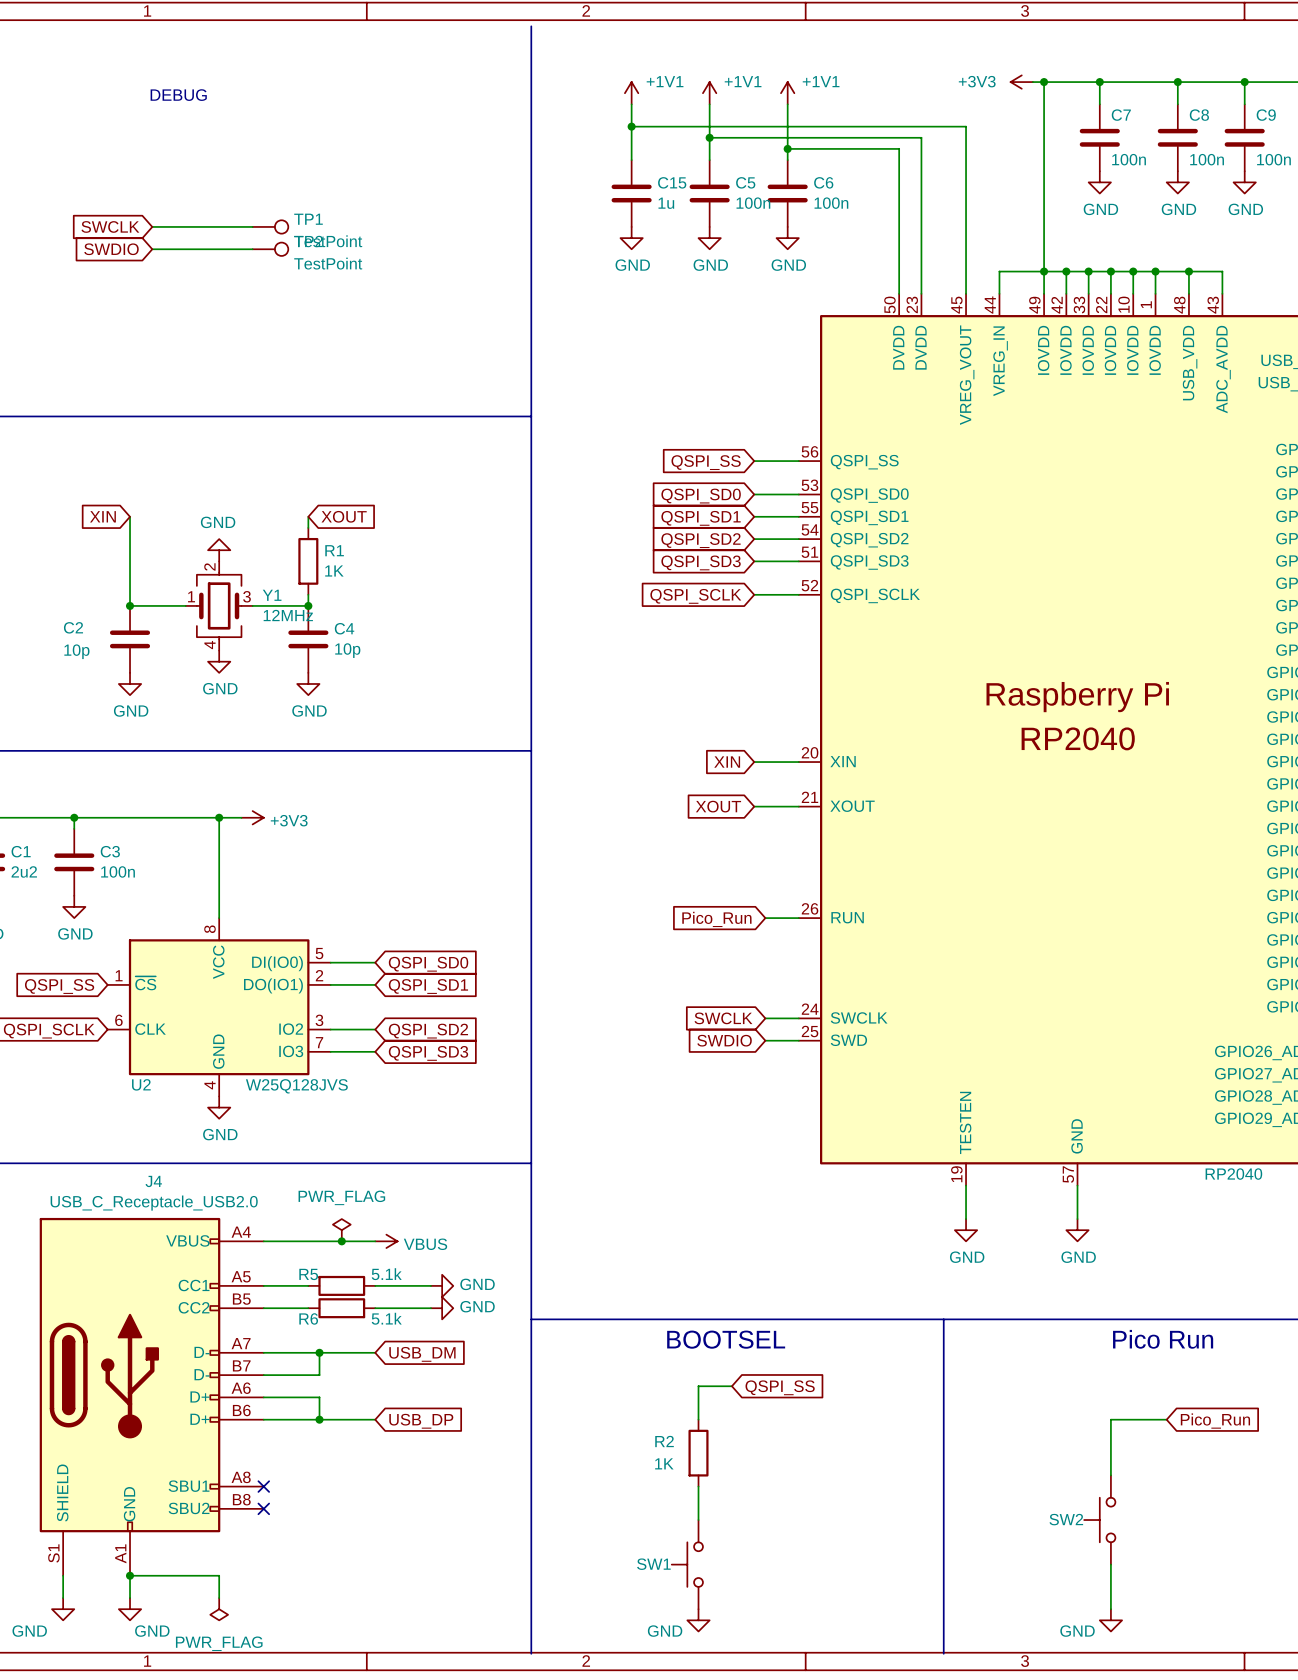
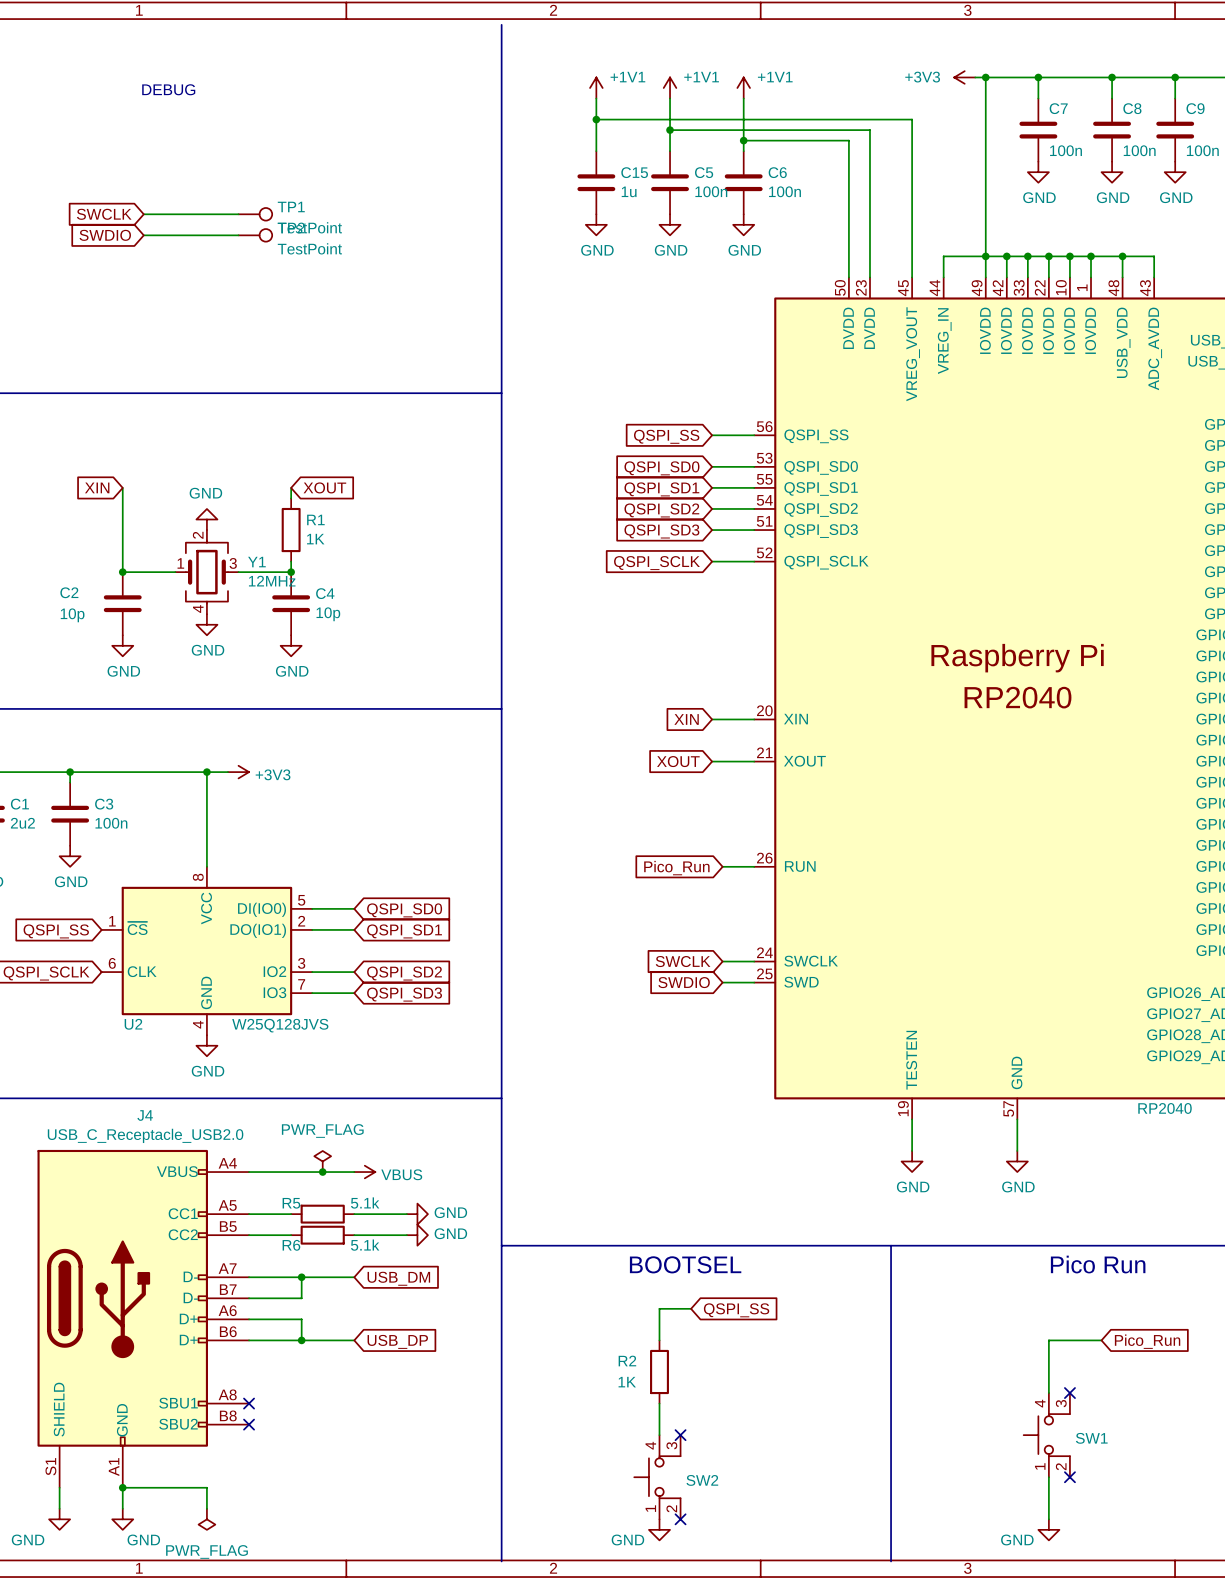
SW2 symbol: [1084, 1475, 1116, 1565] -> [634, 1435, 681, 1520]
no-connect mark: none -> (1069, 1393)
SW2 name position: SW2 (1066, 1519) -> SW2 (702, 1480)
SW1 symbol: [671, 1520, 703, 1610] -> [1023, 1393, 1070, 1478]
no-connect mark: none -> (680, 1435)
SW1 name position: SW1 (653, 1564) -> SW1 (1091, 1438)
no-connect mark: none -> (1069, 1477)
no-connect mark: none -> (680, 1519)

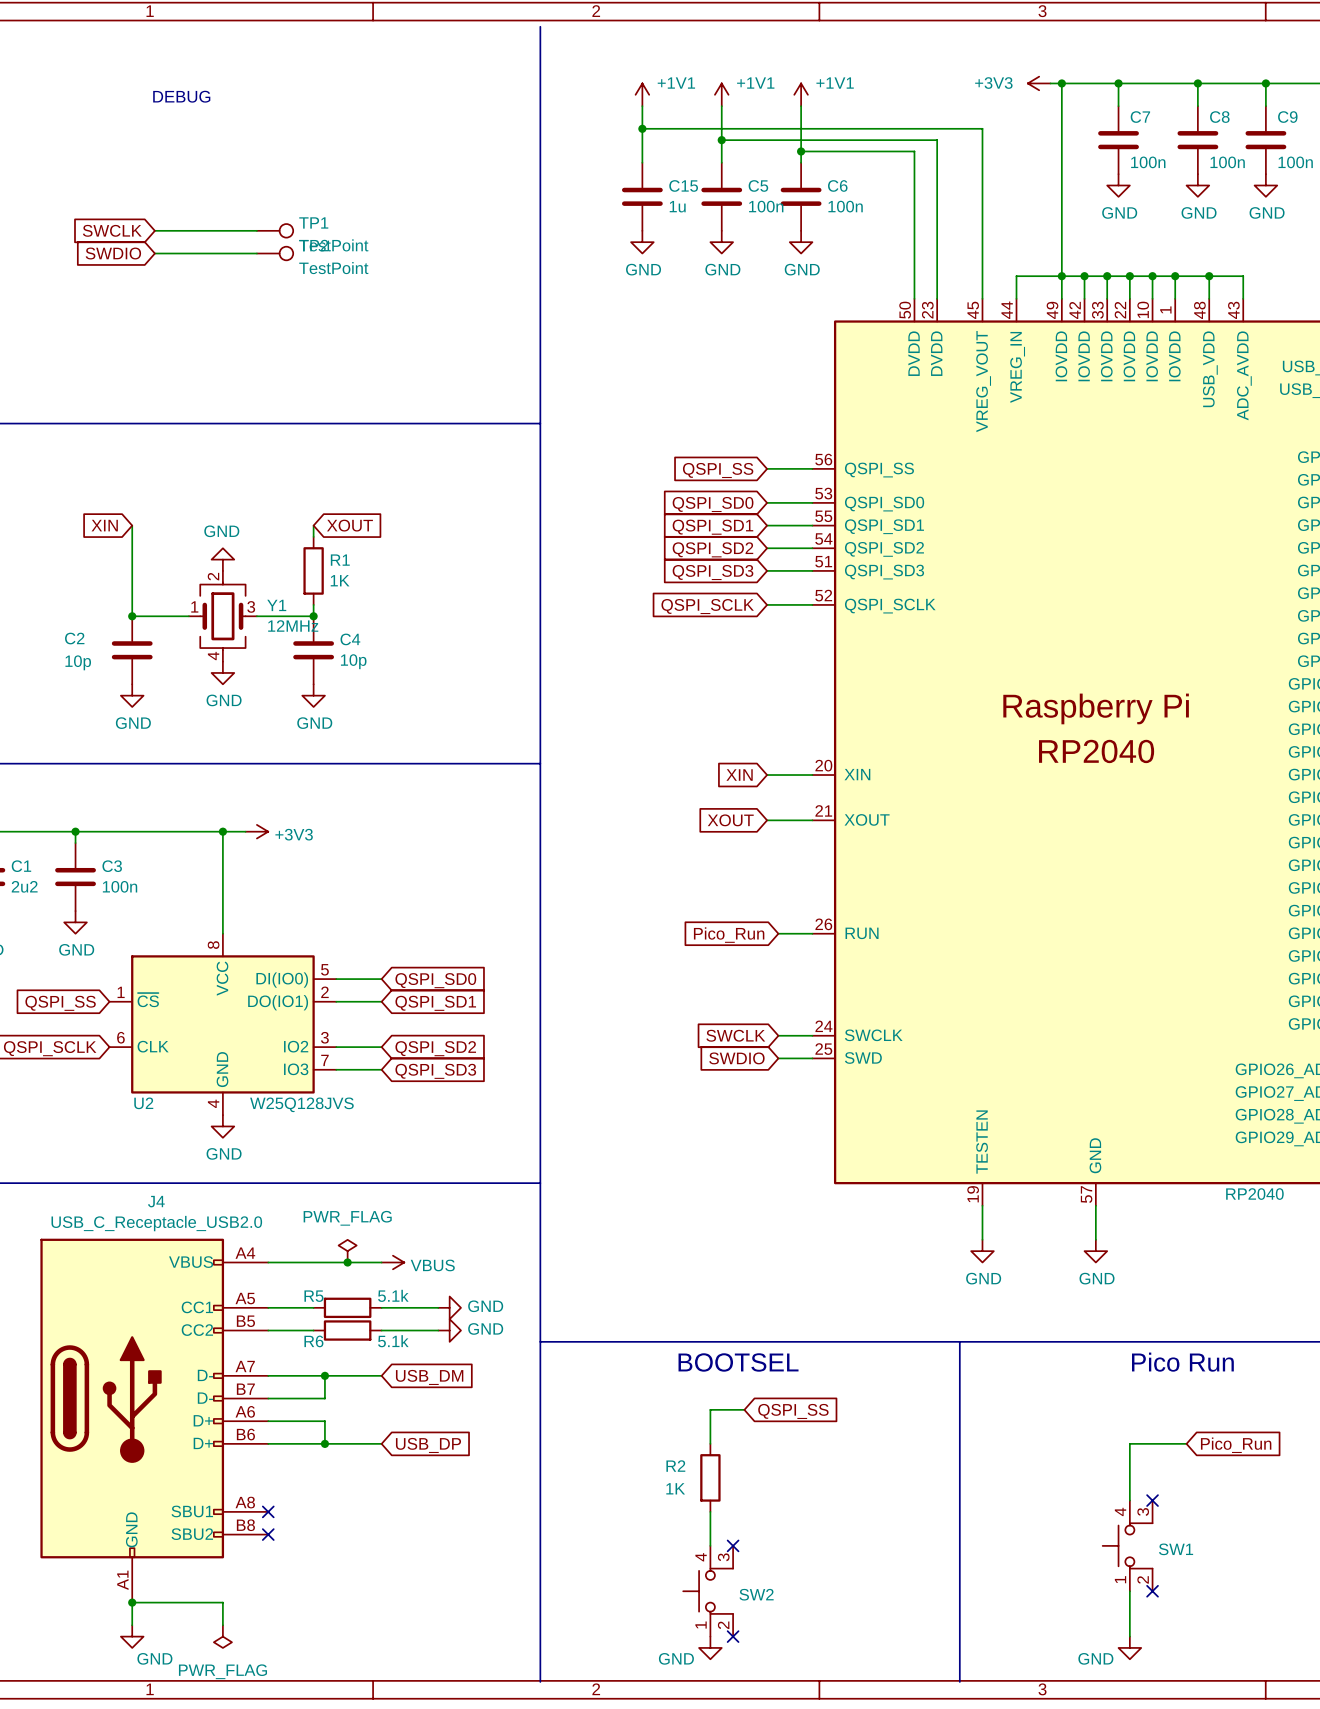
J4 symbol: [37, 1149, 250, 1488] -> [40, 1238, 269, 1603]
wire: (59, 1487) (59, 1508) -> none
power symbol: GND (59, 1519) -> none

